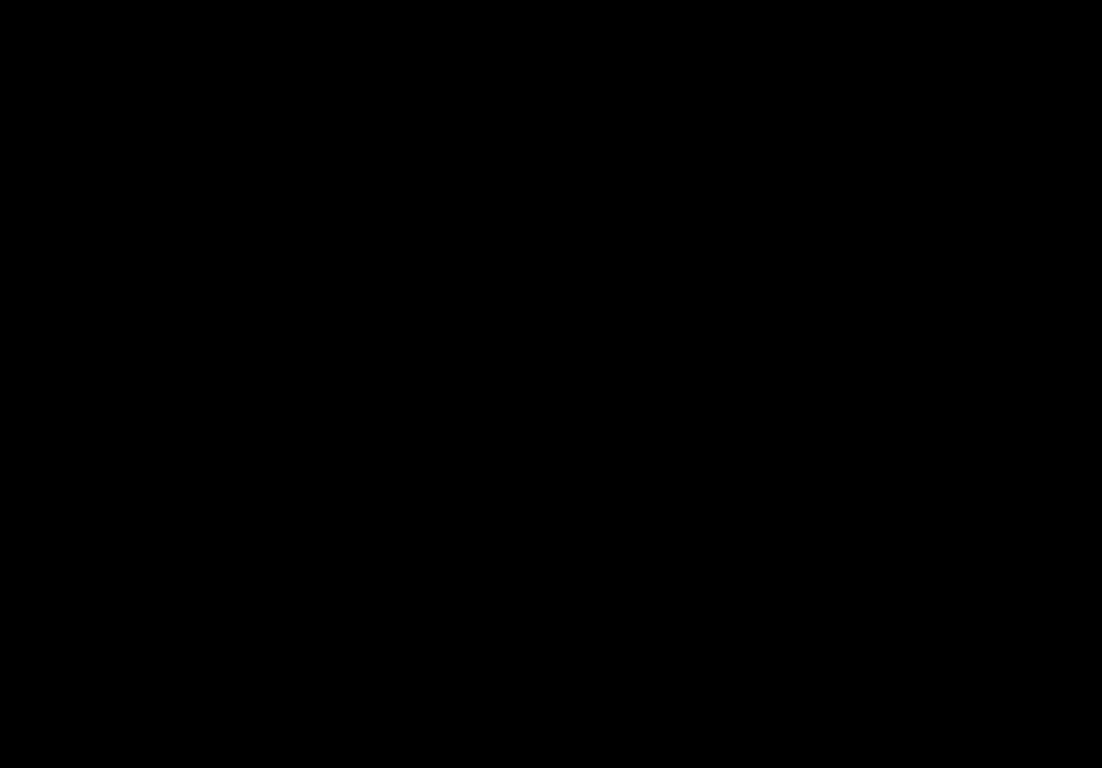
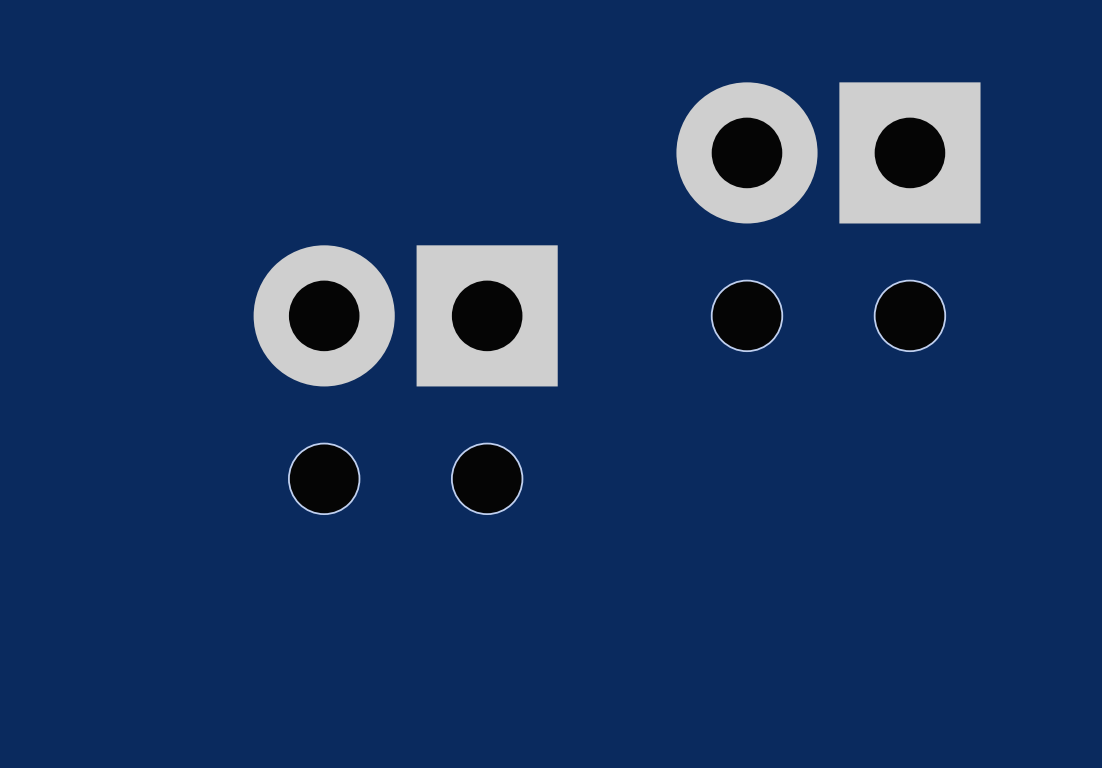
part: none -> (828, 216)
part: none -> (405, 379)

